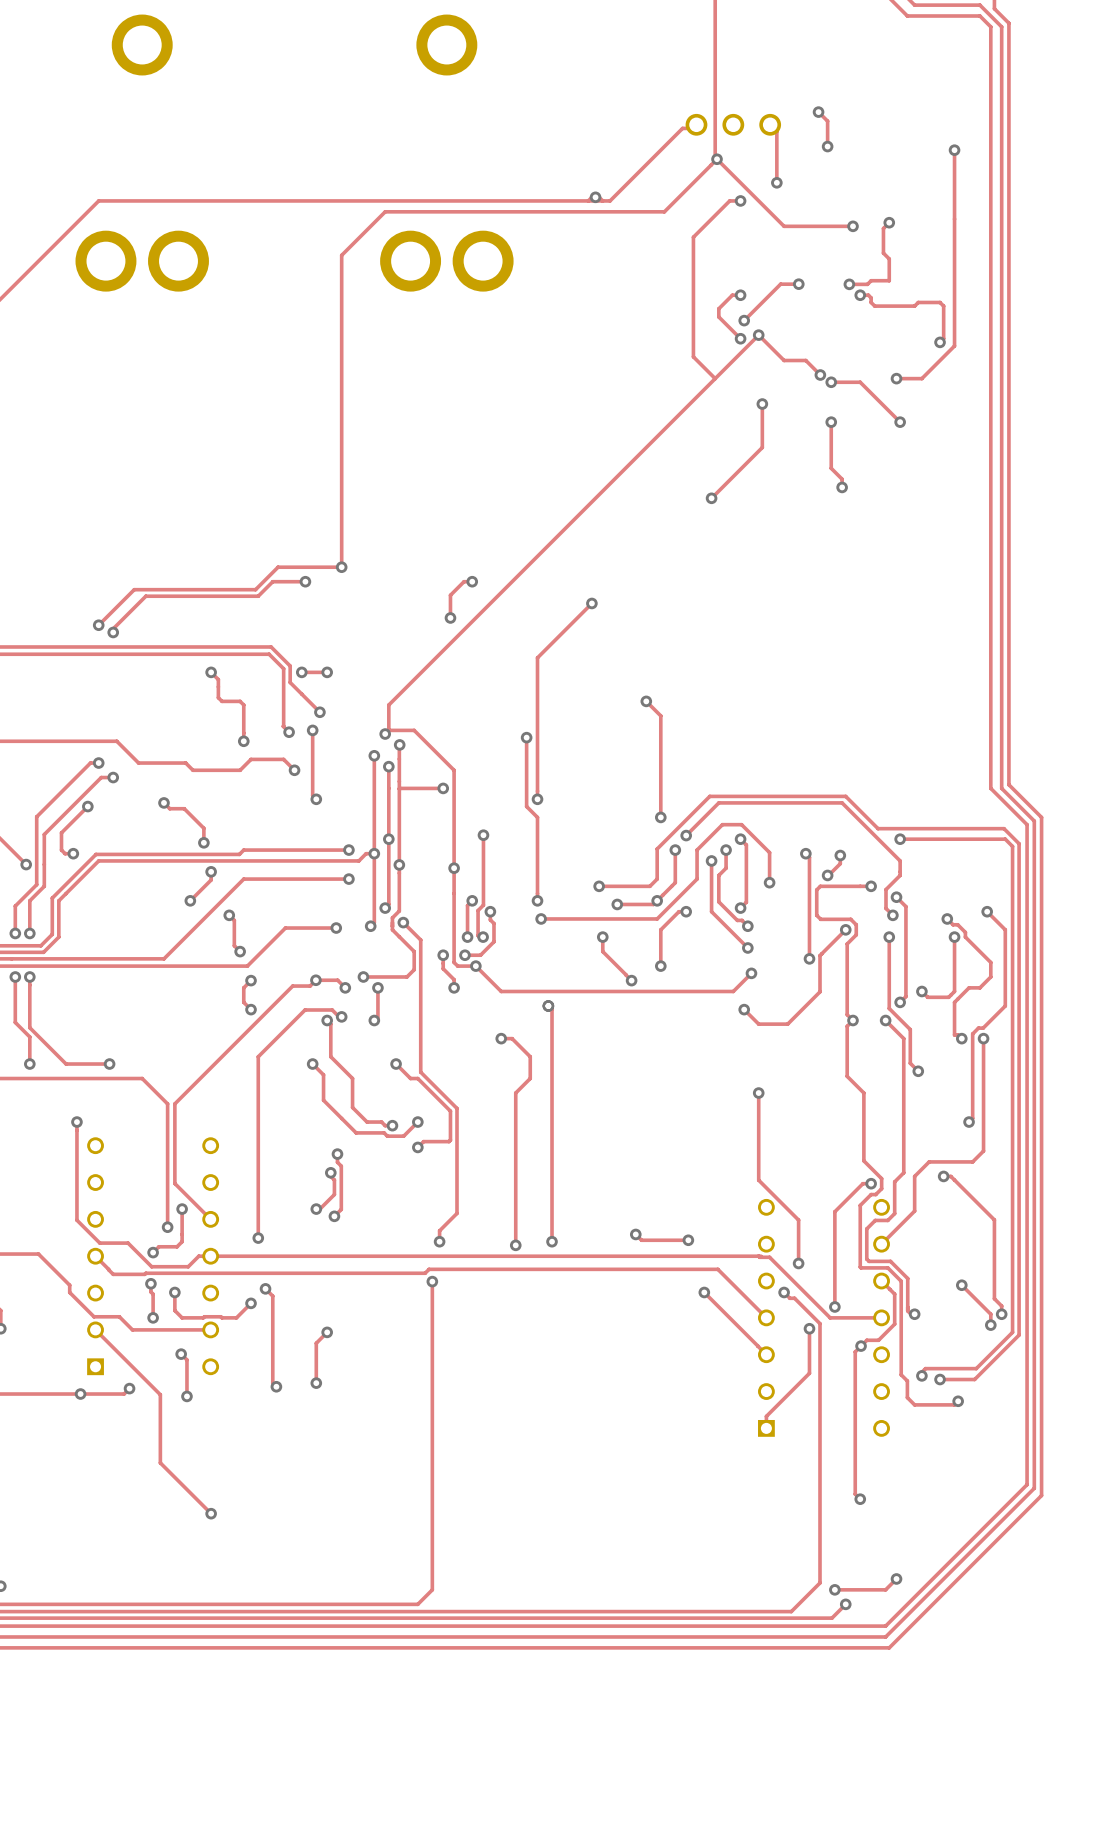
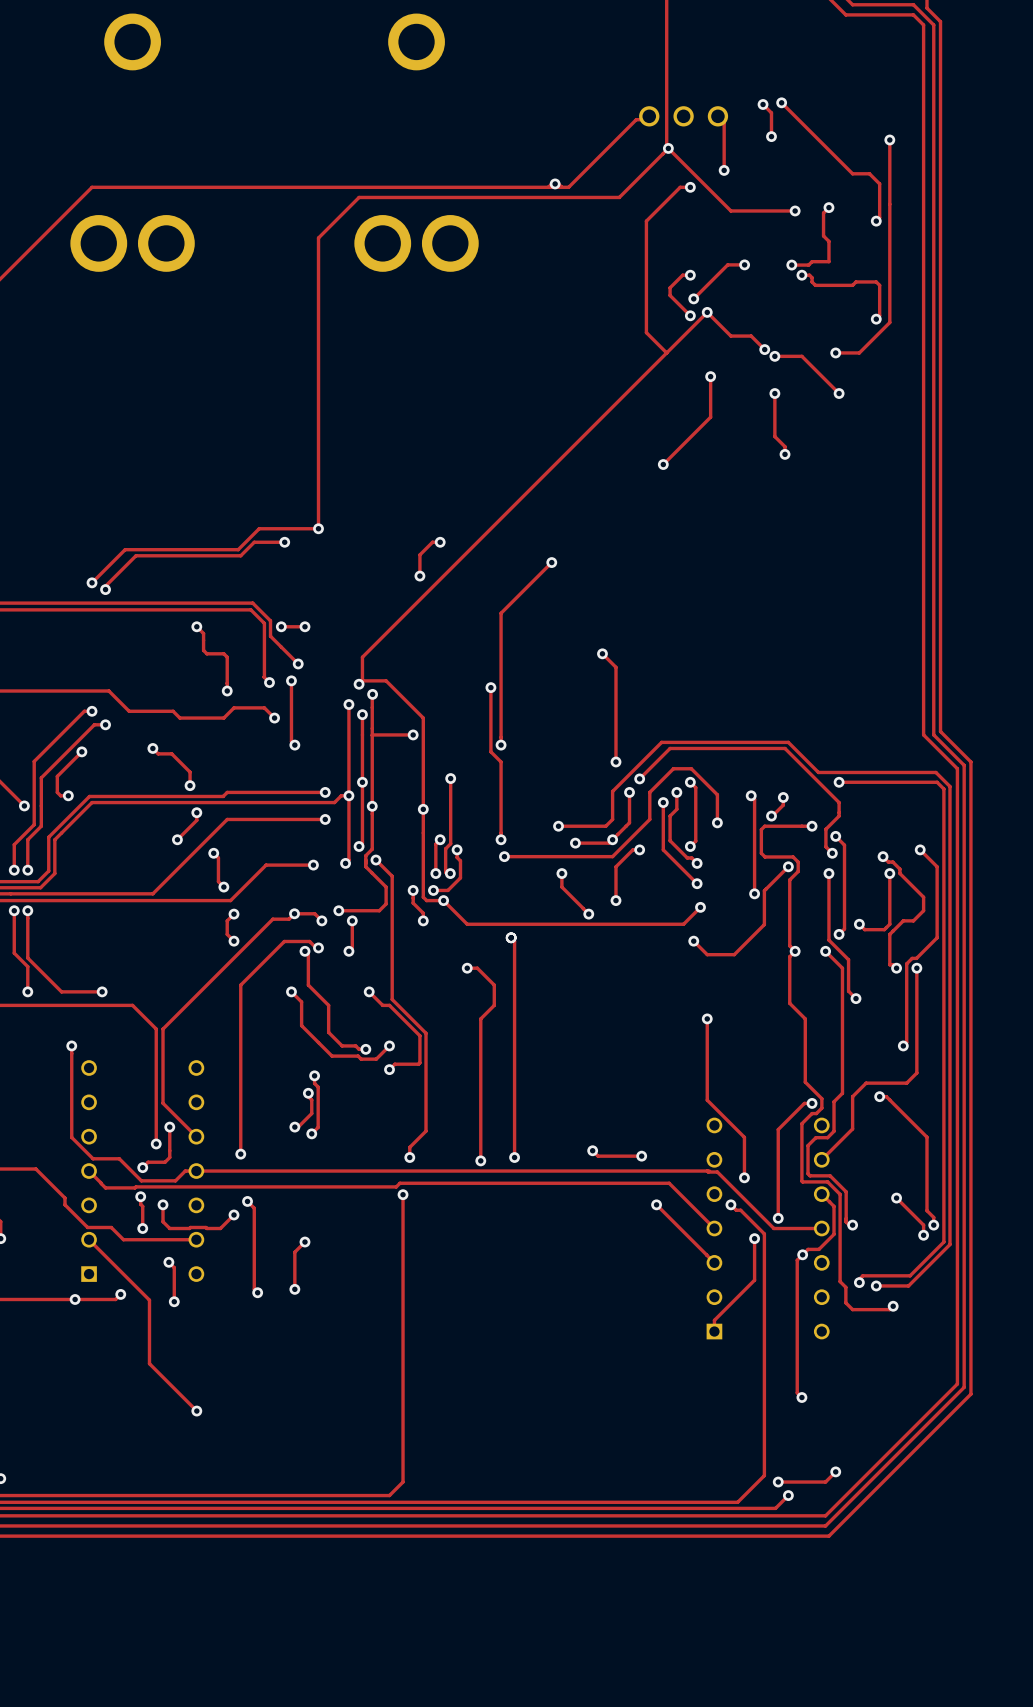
track: none -> (781, 102) (852, 173) (869, 173) (879, 183) (879, 217) (876, 221)
via: none -> (781, 102)
via: none -> (876, 221)

